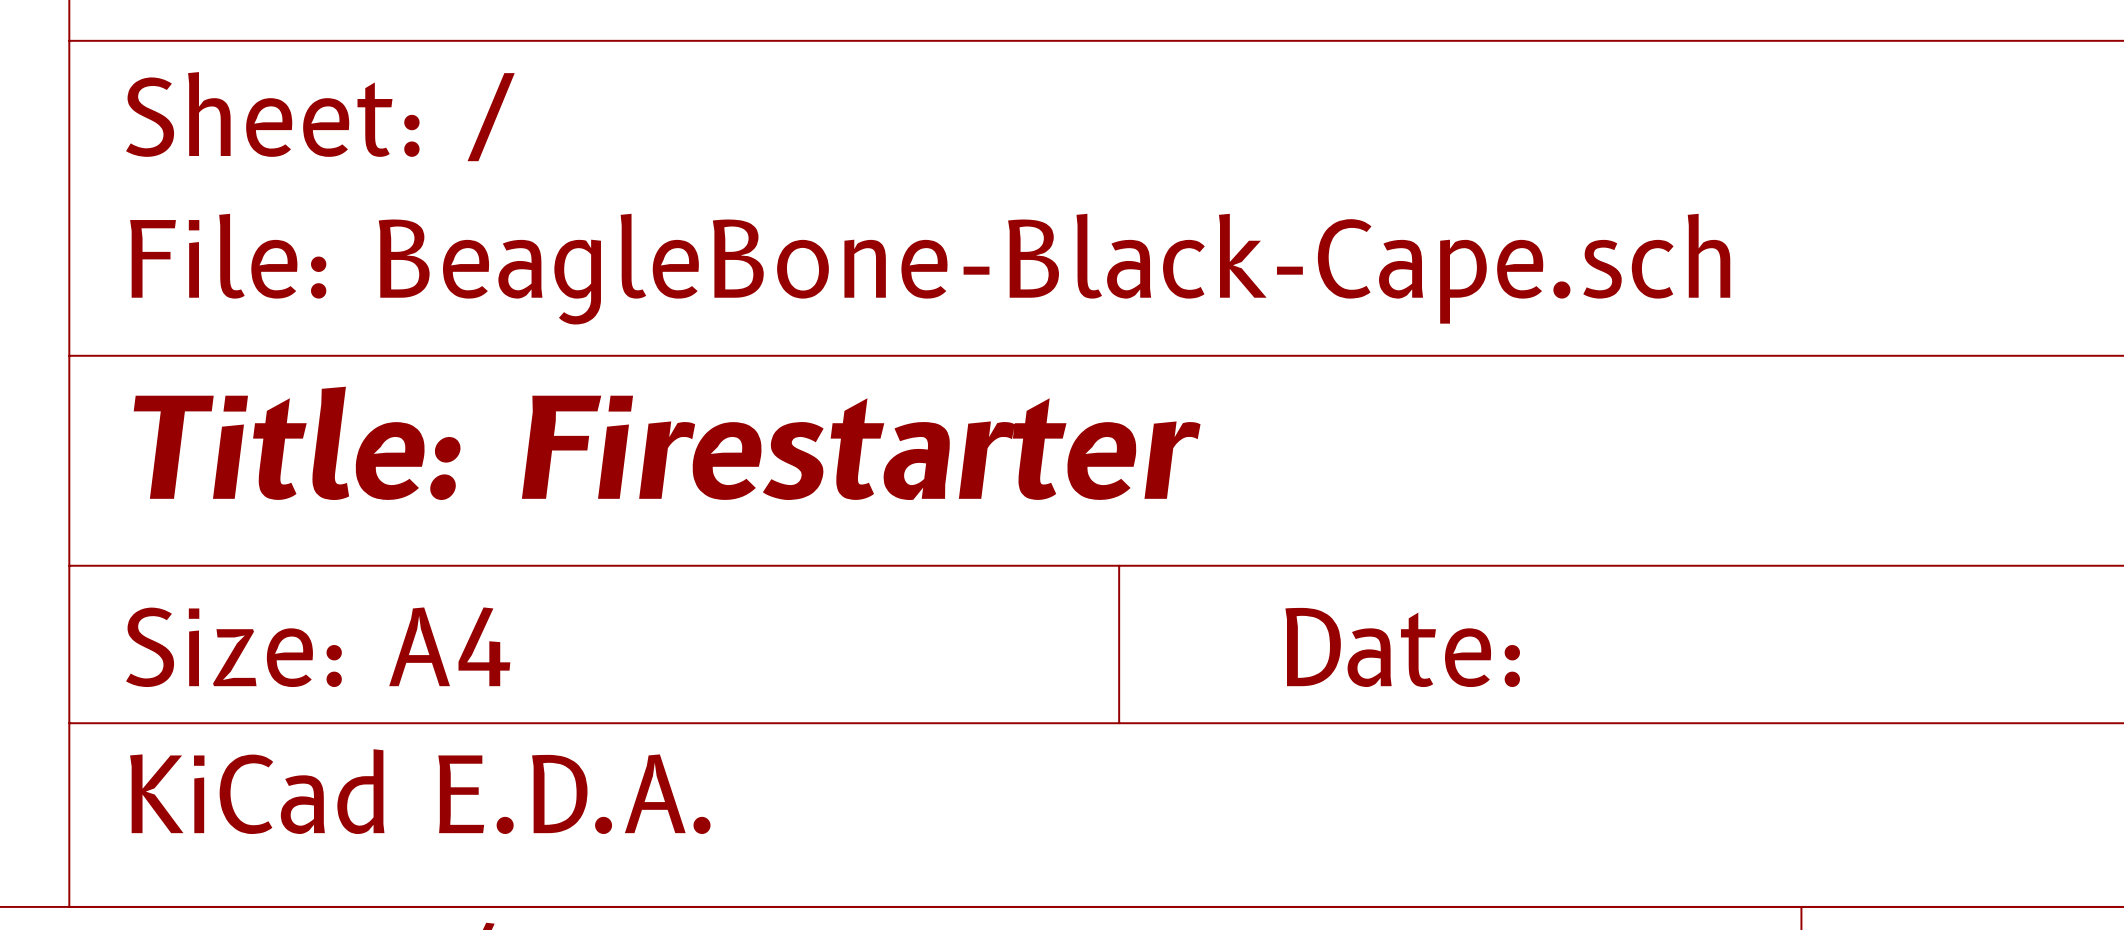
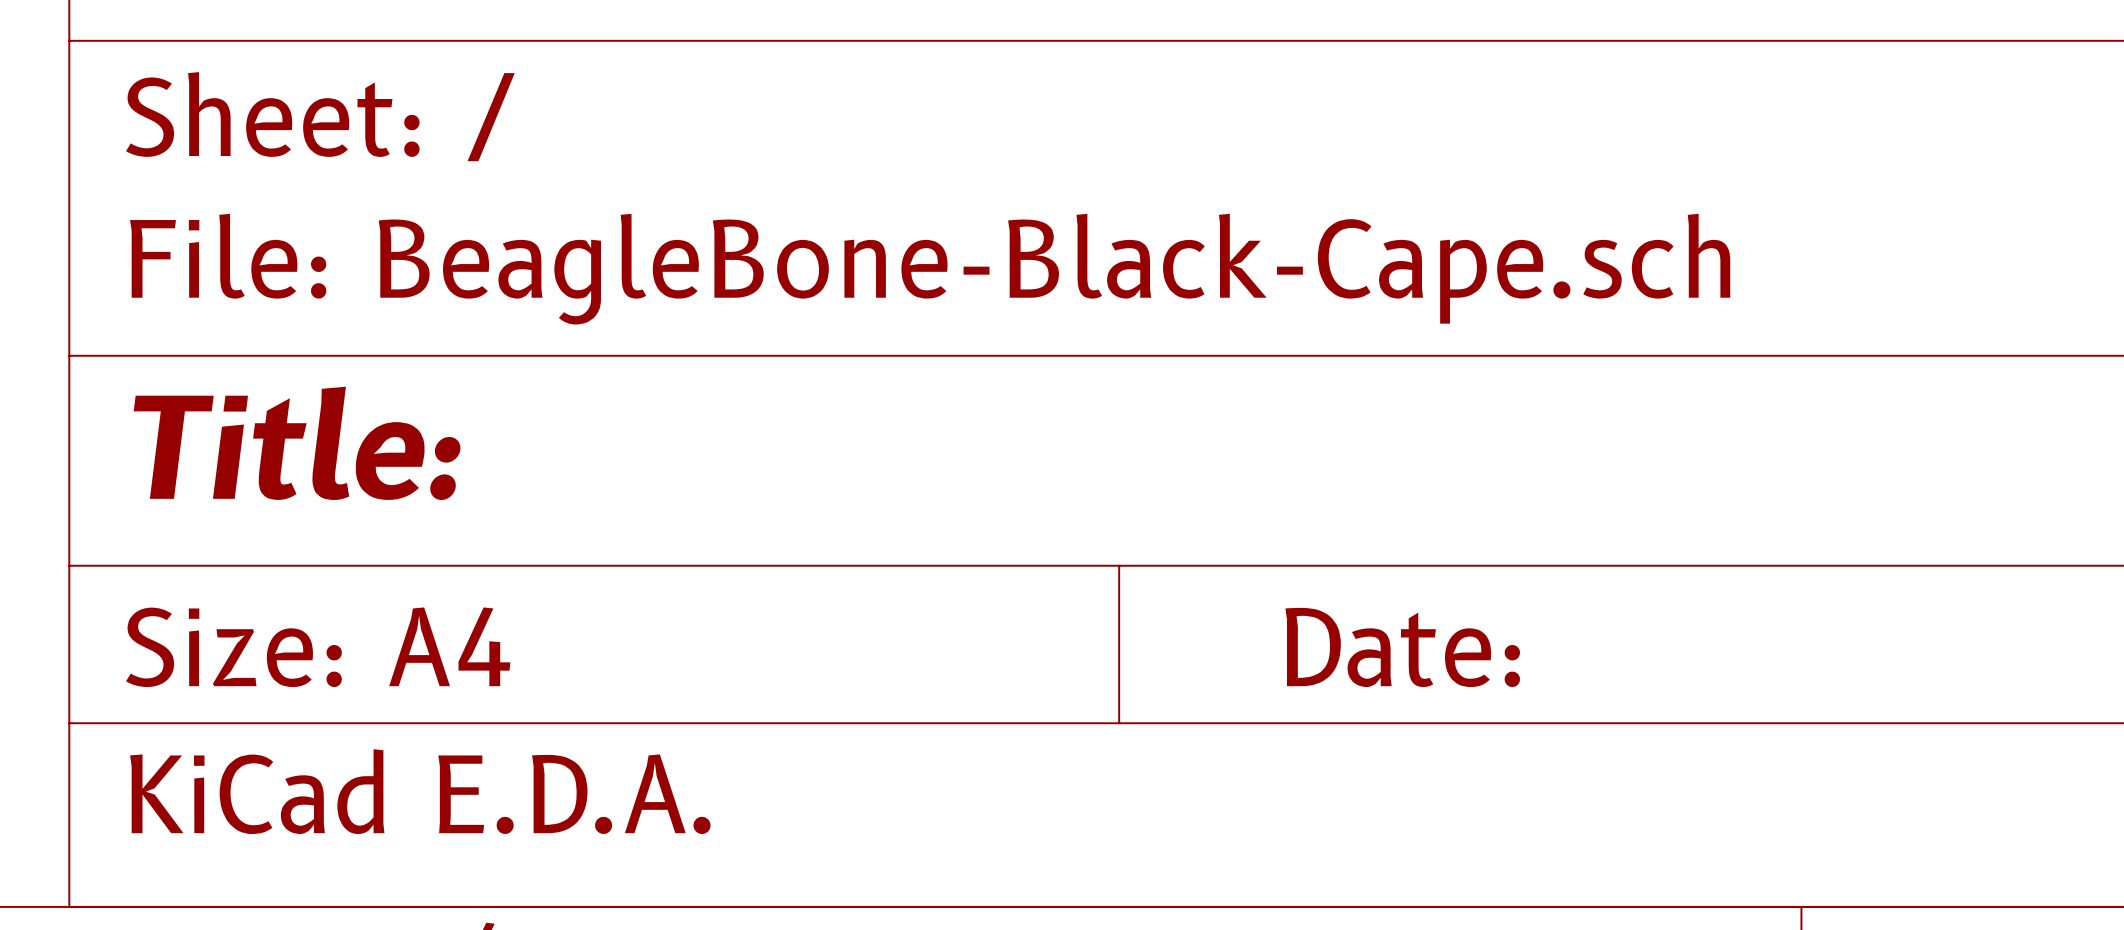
title block: Title: Firestarter (667, 443) -> Title: (297, 443)

